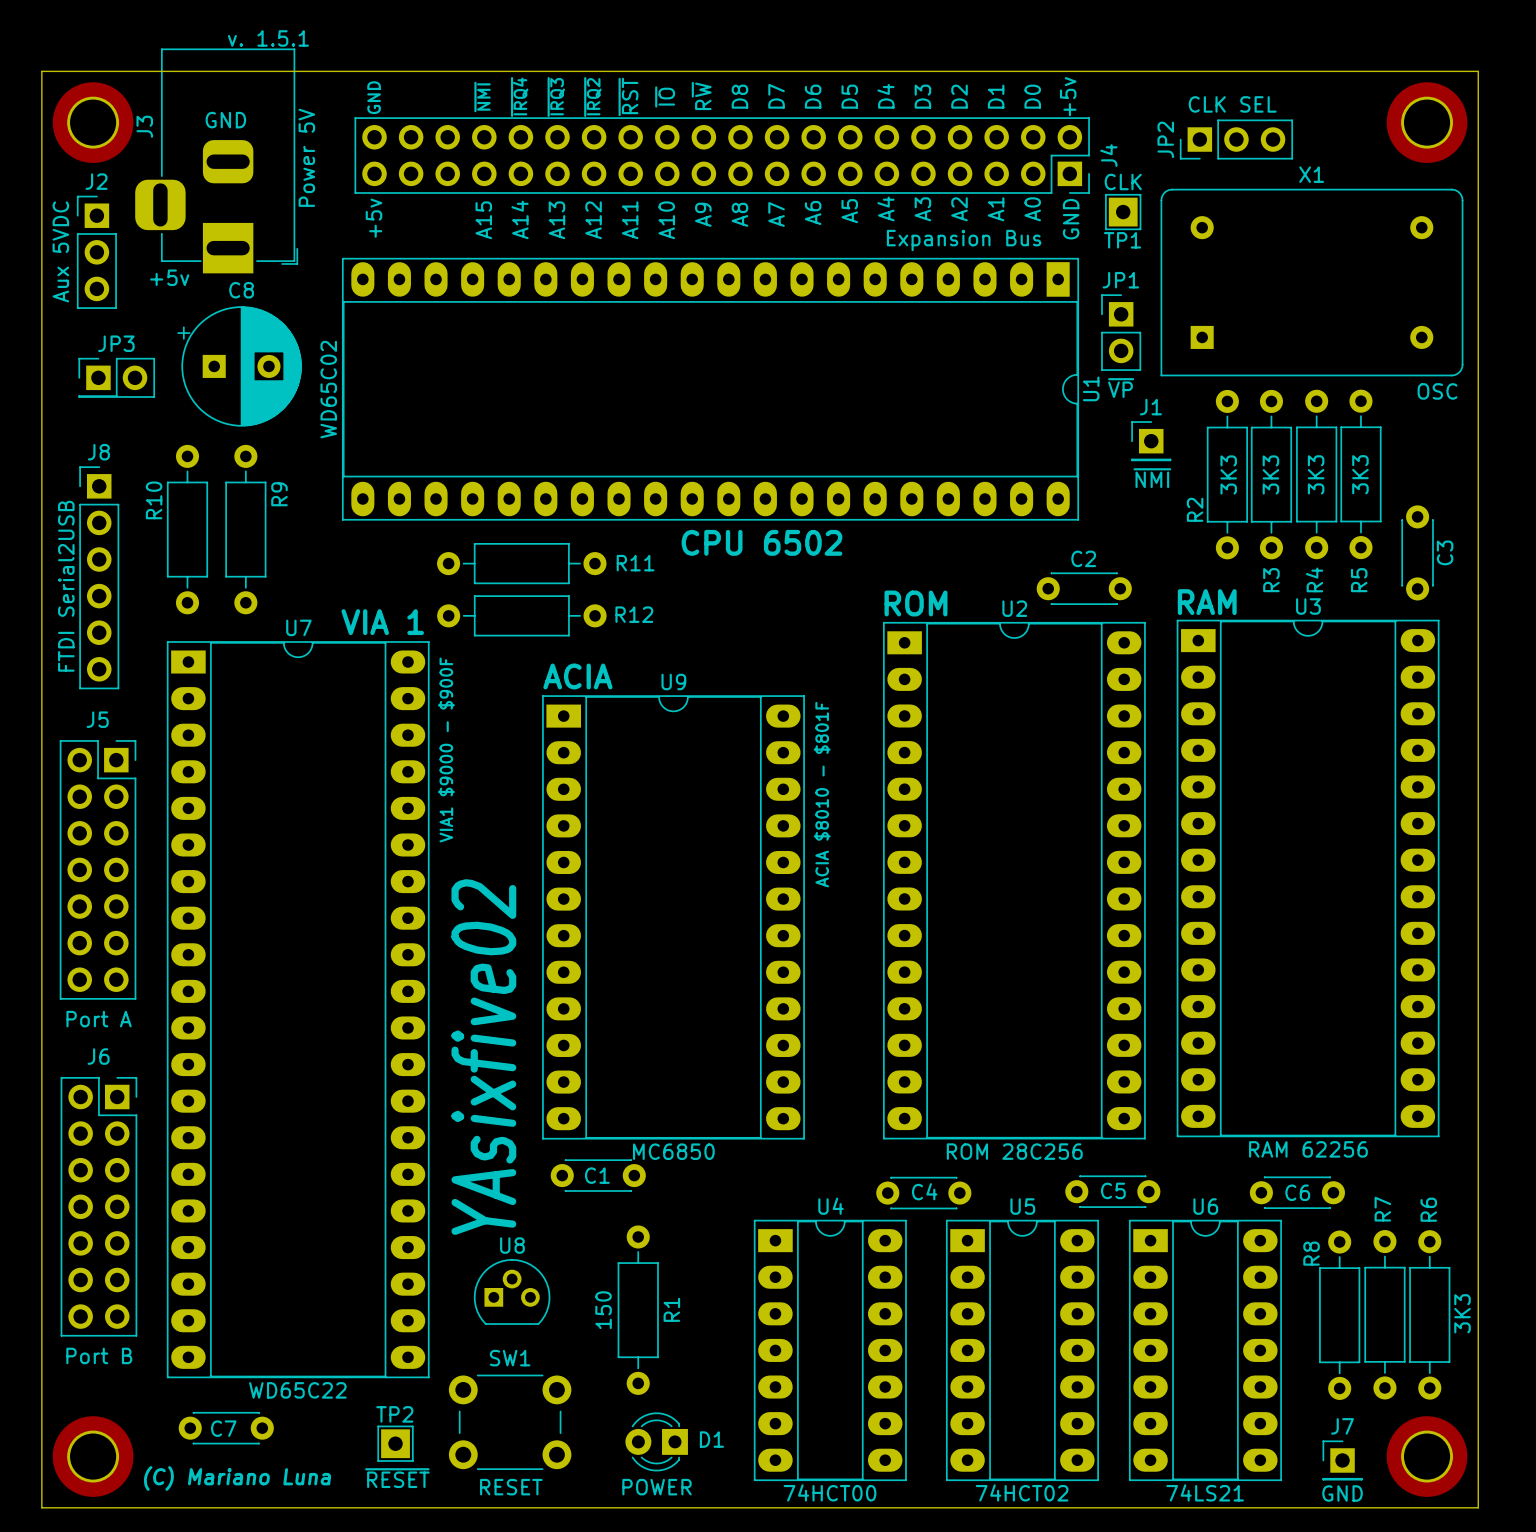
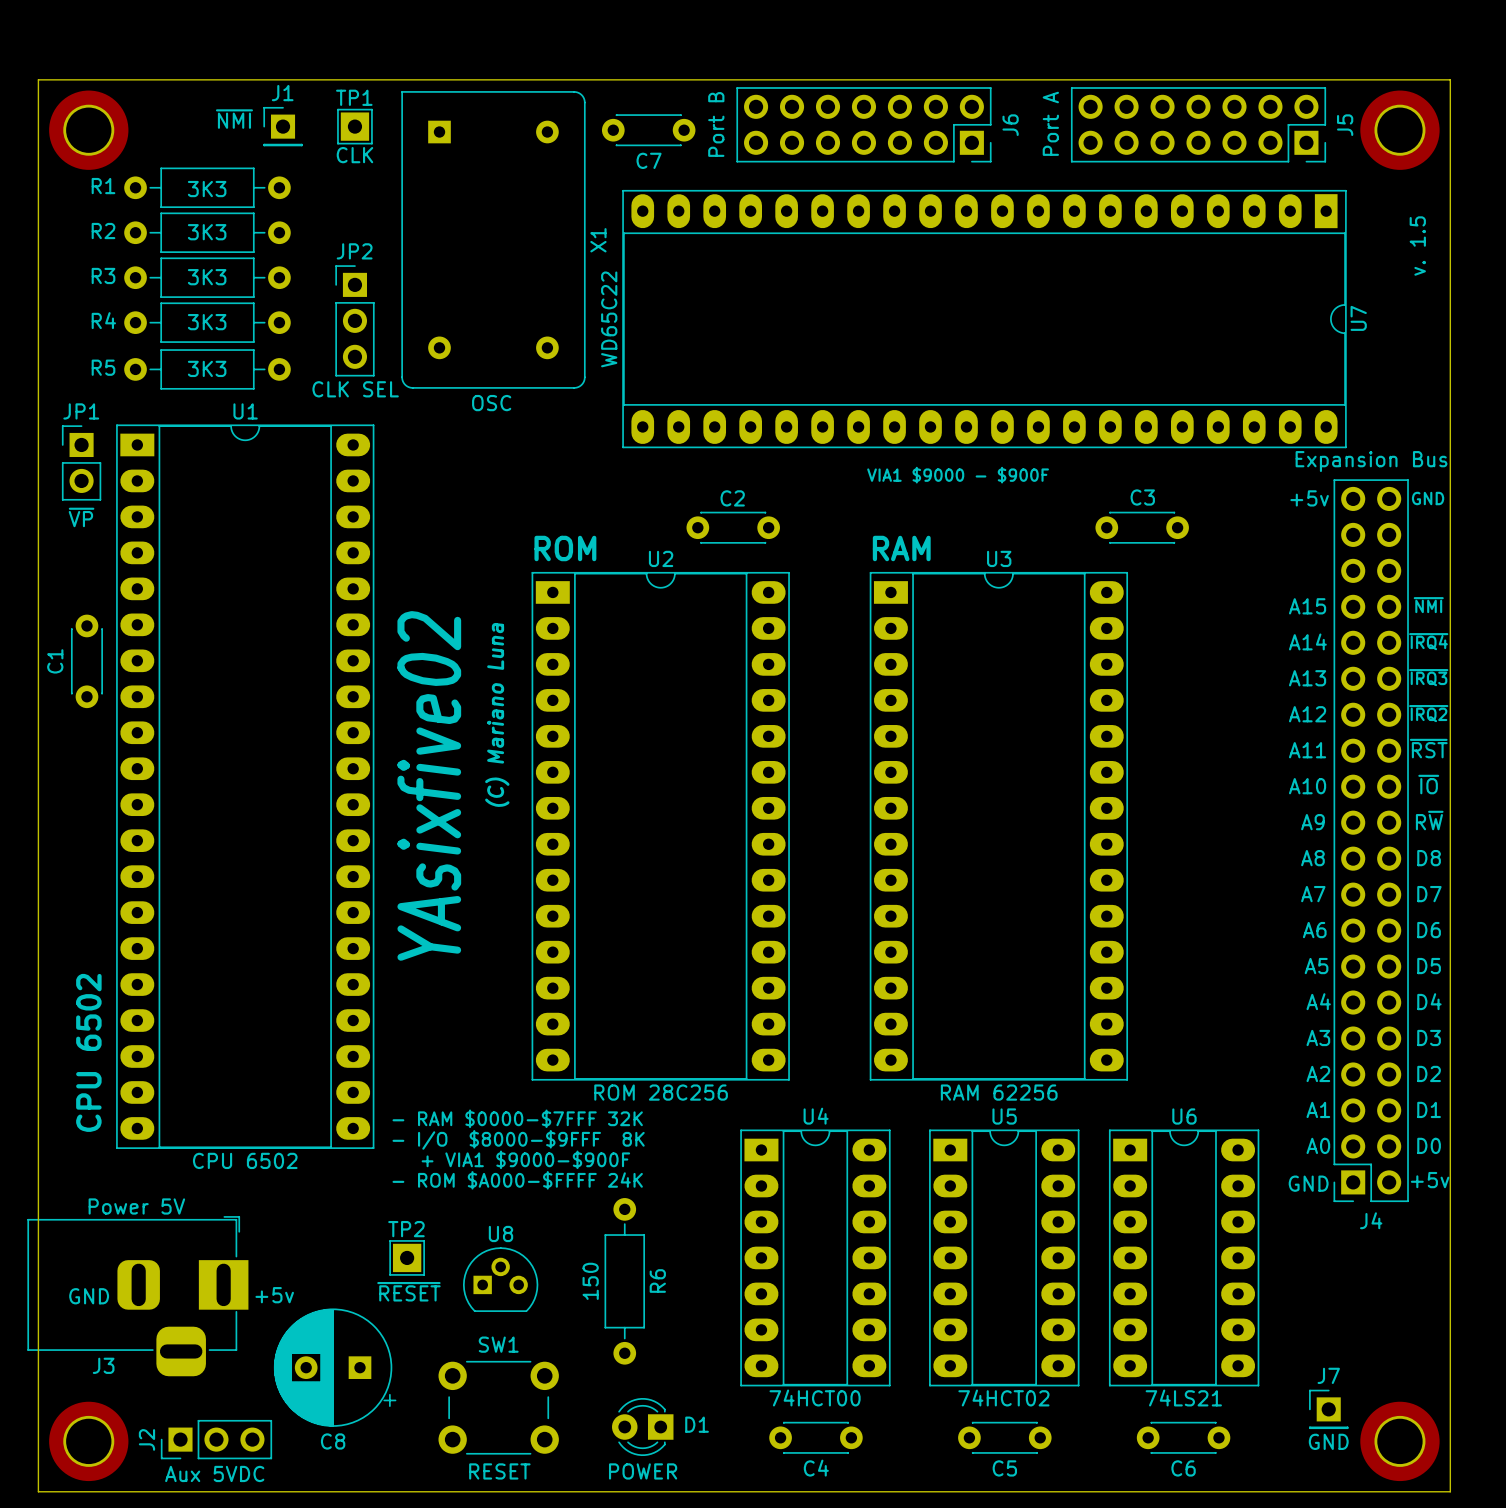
text: v. 1.5.1 (268, 38) -> none
text: ~{RST} (628, 96) -> none
text: R~{W} (701, 96) -> none
text: D8 (739, 96) -> none
text: D7 (776, 96) -> none
text: D6 (813, 96) -> none
text: D5 (849, 96) -> none
text: D4 (885, 96) -> none
text: D3 (922, 96) -> none
text: D2 (959, 96) -> none
text: D1 (996, 96) -> none
text: D0 (1032, 96) -> none
text: +5v (1068, 96) -> none
text: GND (374, 97) -> none
text: ~{NMI} (482, 97) -> none
text: ~{IRQ4} (519, 97) -> none
text: ~{IRQ3} (556, 97) -> none
text: ~{IRQ2} (592, 97) -> none
text: ~{IO} (665, 97) -> none
JP2 value position: CLK SEL (1232, 104) -> CLK SEL (355, 389)
text: GND (225, 120) -> none
JP2 rotation: 0° (1236, 139) -> 90° clockwise (354, 320)
JP2 position: (1236, 139) -> (354, 320)
J4 rotation: 0° (722, 155) -> 90° clockwise (1371, 840)
J4 position: (722, 155) -> (1371, 840)
J3 rotation: 0° (216, 160) -> 90° counterclockwise (137, 1296)
J3 position: (216, 160) -> (137, 1296)
TP1 value position: CLK (1123, 181) -> CLK (354, 155)
text: A4 (885, 208) -> none
text: A3 (922, 209) -> none
text: A2 (959, 209) -> none
text: A1 (996, 209) -> none
text: A0 (1032, 209) -> none
text: A5 (849, 211) -> none
text: A6 (813, 212) -> none
TP1 position: (1123, 212) -> (354, 126)
text: A9 (703, 214) -> none
text: A8 (739, 214) -> none
text: A7 (776, 214) -> none
text: +5v (373, 218) -> none
text: A14 (520, 219) -> none
text: GND (1071, 219) -> none
text: A15 (483, 220) -> none
text: A13 (556, 220) -> none
text: A12 (593, 220) -> none
text: A11 (630, 220) -> none
text: A10 (666, 220) -> none
J4 value position: Expansion Bus (964, 240) -> Expansion Bus (1371, 461)
TP1 name position: TP1 (1122, 240) -> TP1 (354, 97)
text: none -> v. 1.5 (1417, 246)
J2 rotation: 0° (96, 252) -> 90° counterclockwise (216, 1439)
J2 position: (96, 252) -> (216, 1439)
text: +5v (169, 277) -> none
X1 rotation: 0° (1311, 282) -> 90° clockwise (493, 239)
X1 position: (1311, 282) -> (493, 239)
JP1 position: (1121, 332) -> (81, 462)
C8 rotation: 0° (239, 366) -> 180° (335, 1367)
C8 position: (239, 366) -> (335, 1367)
JP3: (116, 377) -> none
U1 value: WD65C02 (328, 389) -> CPU 6502 (245, 1160)
U1 rotation: 0° (710, 389) -> 90° counterclockwise (245, 786)
U1 position: (710, 389) -> (245, 786)
X1 value position: OSC (1437, 391) -> OSC (491, 403)
J1 position: (1151, 441) -> (283, 126)
text: none -> VIA1 $9000 - $900F (958, 475)
R2 rotation: 0° (1227, 474) -> 90° clockwise (207, 232)
R2 position: (1227, 474) -> (207, 232)
R3 rotation: 0° (1271, 474) -> 90° clockwise (207, 277)
R3 position: (1271, 474) -> (207, 277)
R4 rotation: 0° (1316, 474) -> 90° clockwise (207, 322)
R4 position: (1316, 474) -> (207, 322)
R5 rotation: 0° (1360, 474) -> 90° clockwise (207, 369)
R5 position: (1360, 474) -> (207, 369)
J1 value position: ~{NMI} (1152, 478) -> ~{NMI} (234, 119)
text: none -> +5v (1309, 498)
text: none -> GND (1428, 498)
R2 name position: R2 (1195, 509) -> R2 (103, 231)
R10: (187, 529) -> none
R9: (245, 529) -> none
text: CPU 6502 (761, 542) -> none
C3 rotation: 0° (1417, 552) -> 90° clockwise (1142, 527)
C3 position: (1417, 552) -> (1142, 527)
C3 name position: C3 (1445, 552) -> C3 (1142, 497)
R11: (521, 563) -> none
J8: FTDI Serial2USB (99, 577) -> none
C2 position: (1084, 588) -> (733, 527)
text position: RAM (1207, 602) -> RAM (901, 548)
text position: ROM (916, 603) -> ROM (565, 548)
text: none -> ~{NMI} (1428, 605)
text: none -> A15 (1307, 606)
R12: (521, 615) -> none
text: VIA 1 (382, 622) -> none
text: none -> ~{IRQ4} (1428, 641)
text: none -> A14 (1307, 641)
text: ACIA (577, 676) -> none
text: none -> ~{IRQ3} (1428, 677)
text: none -> A13 (1307, 678)
text: none -> A12 (1307, 714)
text: none -> ~{IRQ2} (1428, 713)
text: none -> (C) Mariano Luna (497, 714)
text: VIA1 $9000 - $900F (446, 749) -> none
text: none -> ~{RST} (1428, 748)
text: none -> A11 (1307, 750)
text: none -> ~{IO} (1428, 784)
text: none -> A10 (1307, 786)
text: ACIA $8010 - $801F (822, 794) -> none
text: none -> R~{W} (1429, 820)
text: none -> A9 (1312, 822)
text: none -> A8 (1312, 858)
text: none -> D8 (1429, 858)
J5 rotation: 0° (98, 869) -> 90° clockwise (1198, 124)
J5 position: (98, 869) -> (1198, 124)
U3 position: (1308, 878) -> (998, 826)
U2 position: (1014, 880) -> (660, 826)
text: none -> A7 (1313, 894)
text: none -> D7 (1429, 894)
U9: MC6850 (673, 917) -> none
text: none -> A6 (1314, 930)
text: none -> D6 (1429, 930)
text: none -> A5 (1316, 966)
text: none -> D5 (1429, 966)
U7 rotation: 0° (298, 1009) -> 90° clockwise (984, 319)
U7 position: (298, 1009) -> (984, 319)
text: none -> A4 (1318, 1001)
text: none -> D4 (1429, 1001)
text: none -> A3 (1318, 1037)
text: none -> D3 (1429, 1037)
text position: YAsixfive02 (483, 1057) -> YAsixfive02 (429, 785)
text: none -> CPU 6502 (88, 1052)
text: none -> A2 (1318, 1073)
text: none -> D2 (1429, 1073)
text: none -> A1 (1318, 1109)
text: none -> D1 (1429, 1109)
text: none -> - RAM $0000-$7FFF 32K (517, 1118)
text: none -> - I/O $8000-$9FFF 8K (518, 1139)
text: none -> A0 (1318, 1145)
text: none -> D0 (1429, 1145)
text: none -> + VIA1 $9000-$900F (525, 1159)
C1 name position: C1 (597, 1175) -> C1 (55, 661)
C1 rotation: 0° (598, 1175) -> 90° clockwise (86, 661)
C1 position: (598, 1175) -> (86, 661)
text: none -> - ROM $A000-$FFFF 24K (517, 1180)
C5 name position: C5 (1113, 1190) -> C5 (1004, 1468)
text: none -> +5v (1430, 1180)
C4 name position: C4 (924, 1191) -> C4 (816, 1468)
C5 position: (1112, 1191) -> (1004, 1437)
C6 position: (1297, 1192) -> (1183, 1437)
C6 name position: C6 (1297, 1192) -> C6 (1183, 1468)
C4 position: (923, 1193) -> (815, 1437)
text: none -> GND (1308, 1183)
J6 rotation: 0° (98, 1206) -> 90° clockwise (863, 124)
J6 position: (98, 1206) -> (863, 124)
R6 name position: R6 (1428, 1209) -> R6 (657, 1280)
text: none -> +5v (274, 1295)
text: none -> GND (89, 1296)
R1 name position: R1 (671, 1309) -> R1 (103, 186)
R1 value: 150 (603, 1310) -> 3K3 (207, 189)
R1 rotation: 0° (638, 1310) -> 90° clockwise (207, 187)
R1 position: (638, 1310) -> (207, 187)
R6 value: 3K3 (1462, 1313) -> 150 (590, 1281)
R7: (1384, 1314) -> none
R6 position: (1429, 1314) -> (624, 1281)
R8: (1339, 1315) -> none
U4 position: (830, 1350) -> (815, 1257)
U5 position: (1022, 1350) -> (1004, 1257)
U6 position: (1205, 1350) -> (1184, 1257)
C7 name position: C7 (223, 1428) -> C7 (649, 160)
C7 position: (226, 1428) -> (648, 130)
TP2 position: (395, 1443) -> (407, 1257)
J7 position: (1342, 1460) -> (1328, 1409)
text: (C) Mariano Luna (237, 1478) -> none

